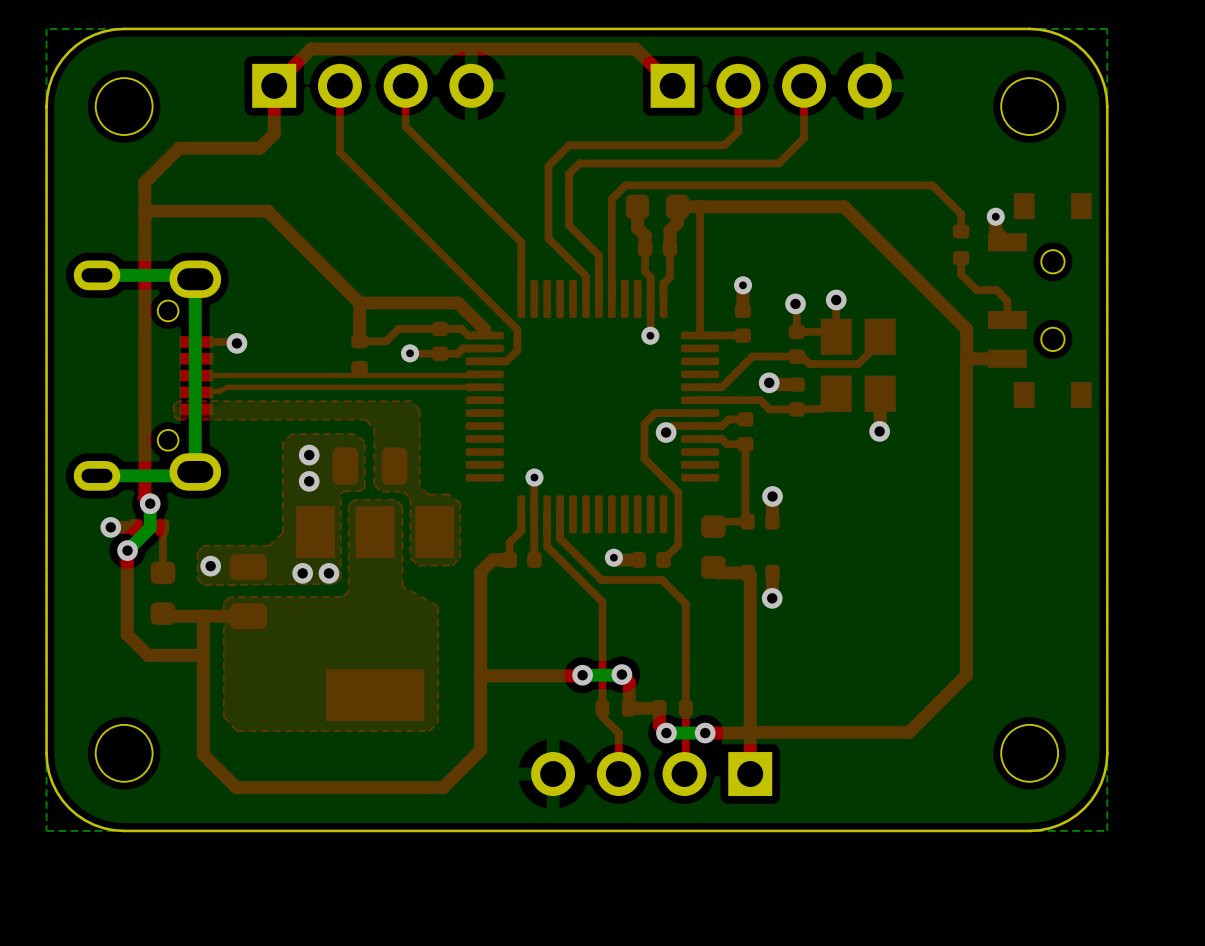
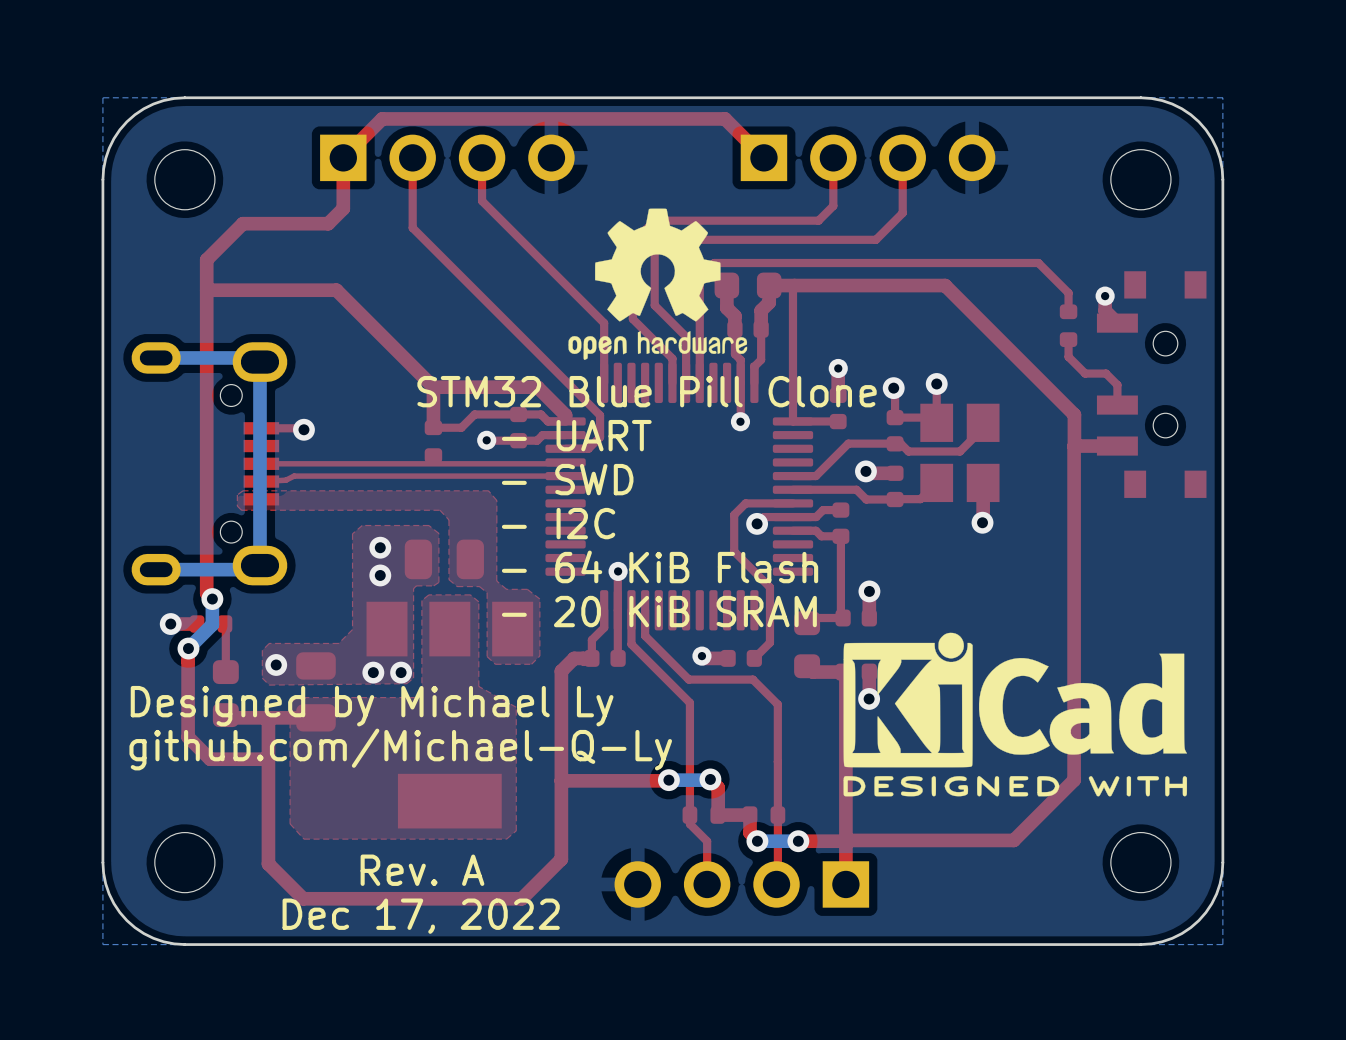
drawing: none -> [568, 208, 748, 360]
text: none -> STM32 Blue Pill Clone (647, 391)
text: none -> - UART (576, 435)
text: none -> - SWD (567, 479)
text: none -> - I2C (558, 523)
text: none -> - 64 KiB Flash (660, 566)
text: none -> - 20 KiB SRAM (659, 611)
drawing: none -> [843, 632, 1188, 797]
text: none -> Designed by Michael Ly (372, 706)
text: none -> github.com/Michael-Q-Ly (400, 749)
text: none -> Rev. A (422, 870)
text: none -> Dec 17, 2022 (421, 916)

